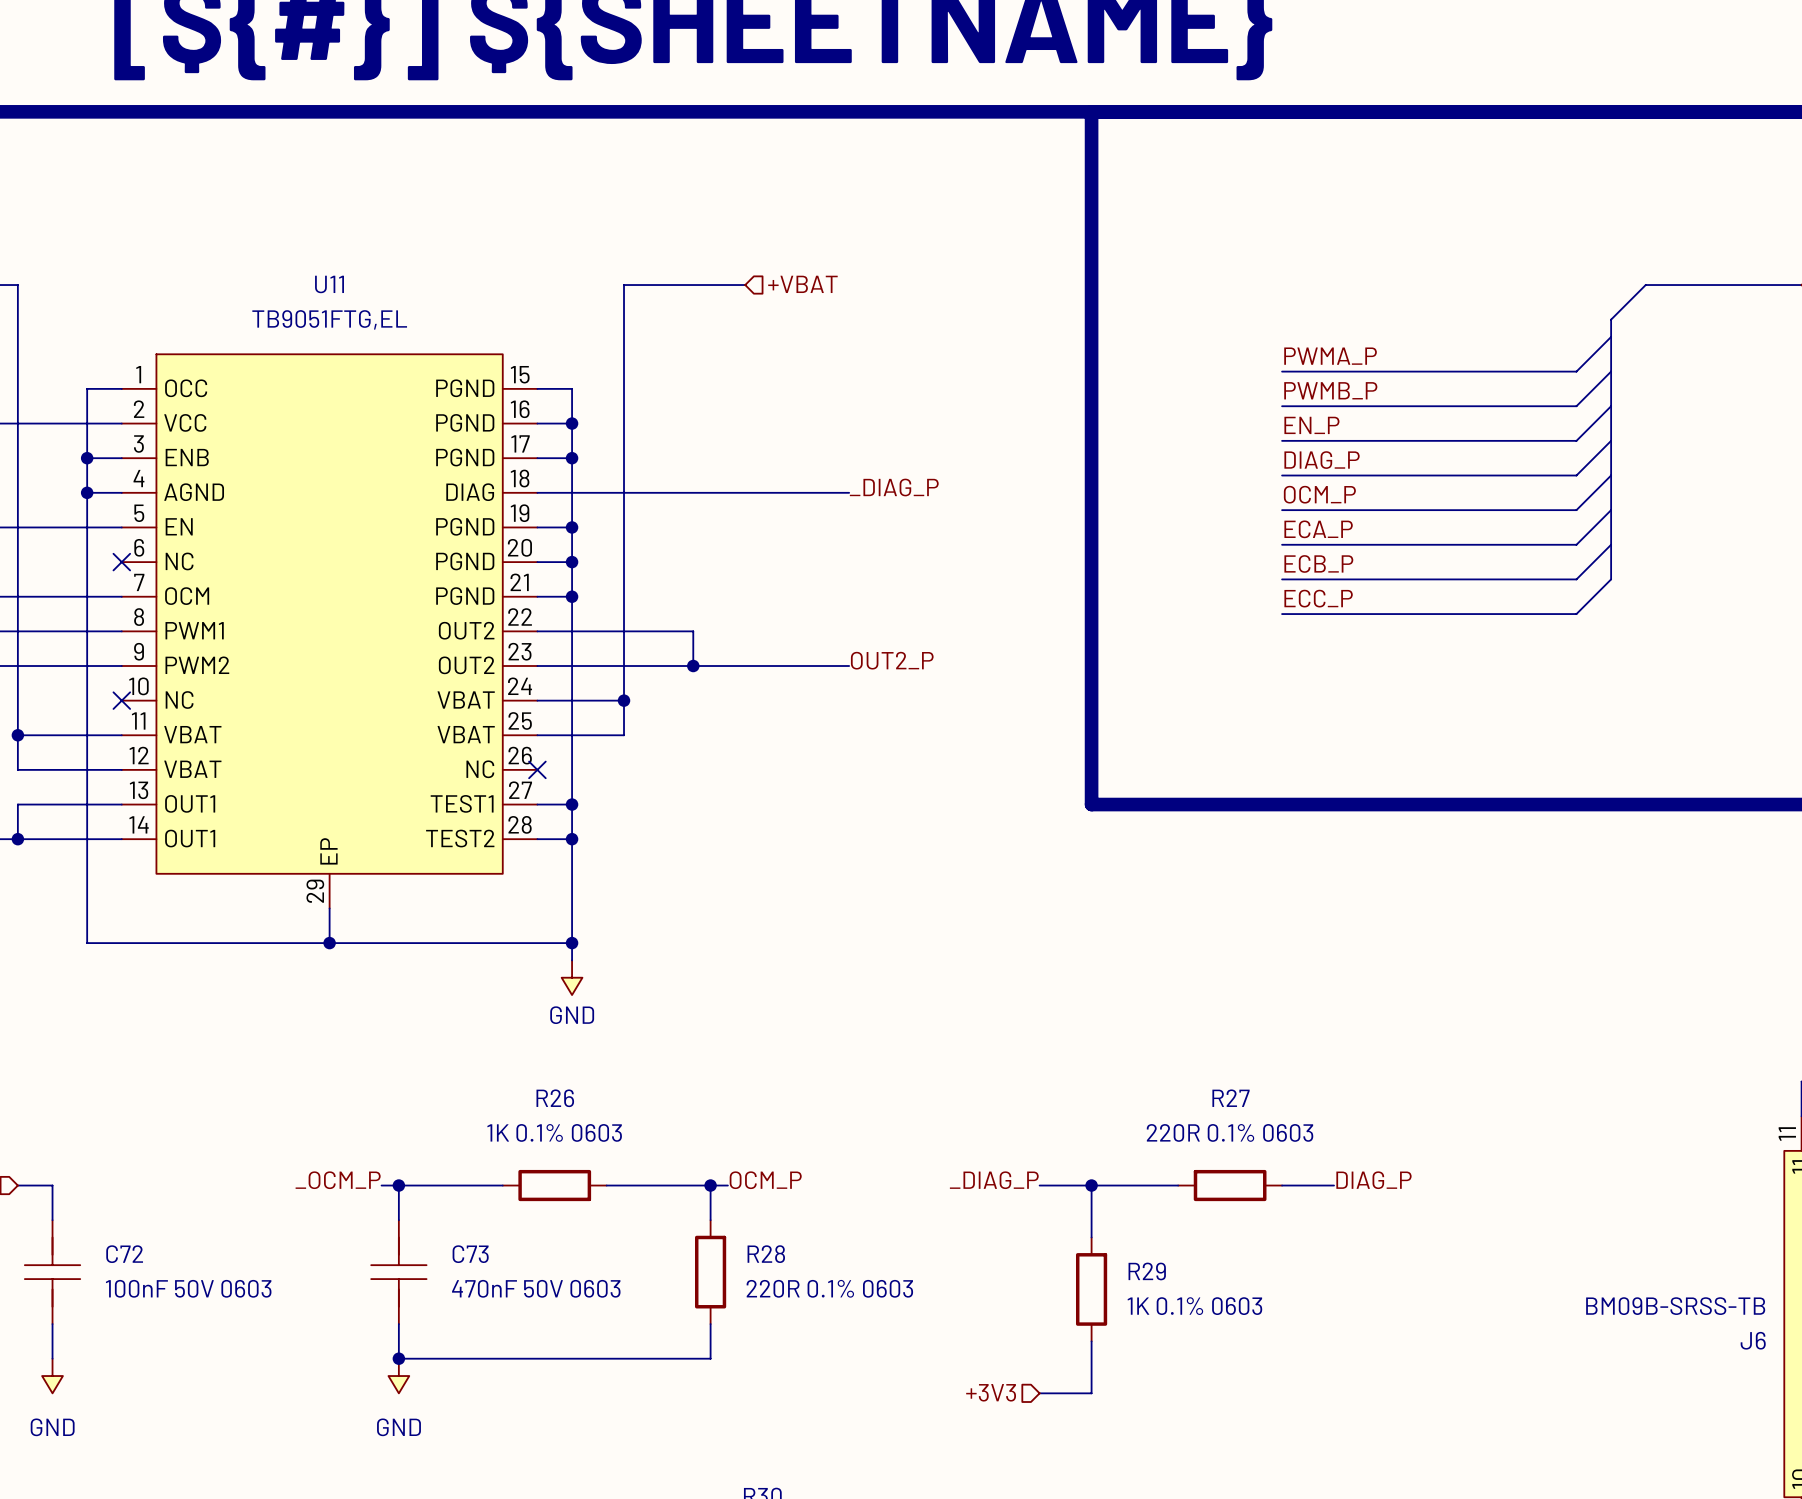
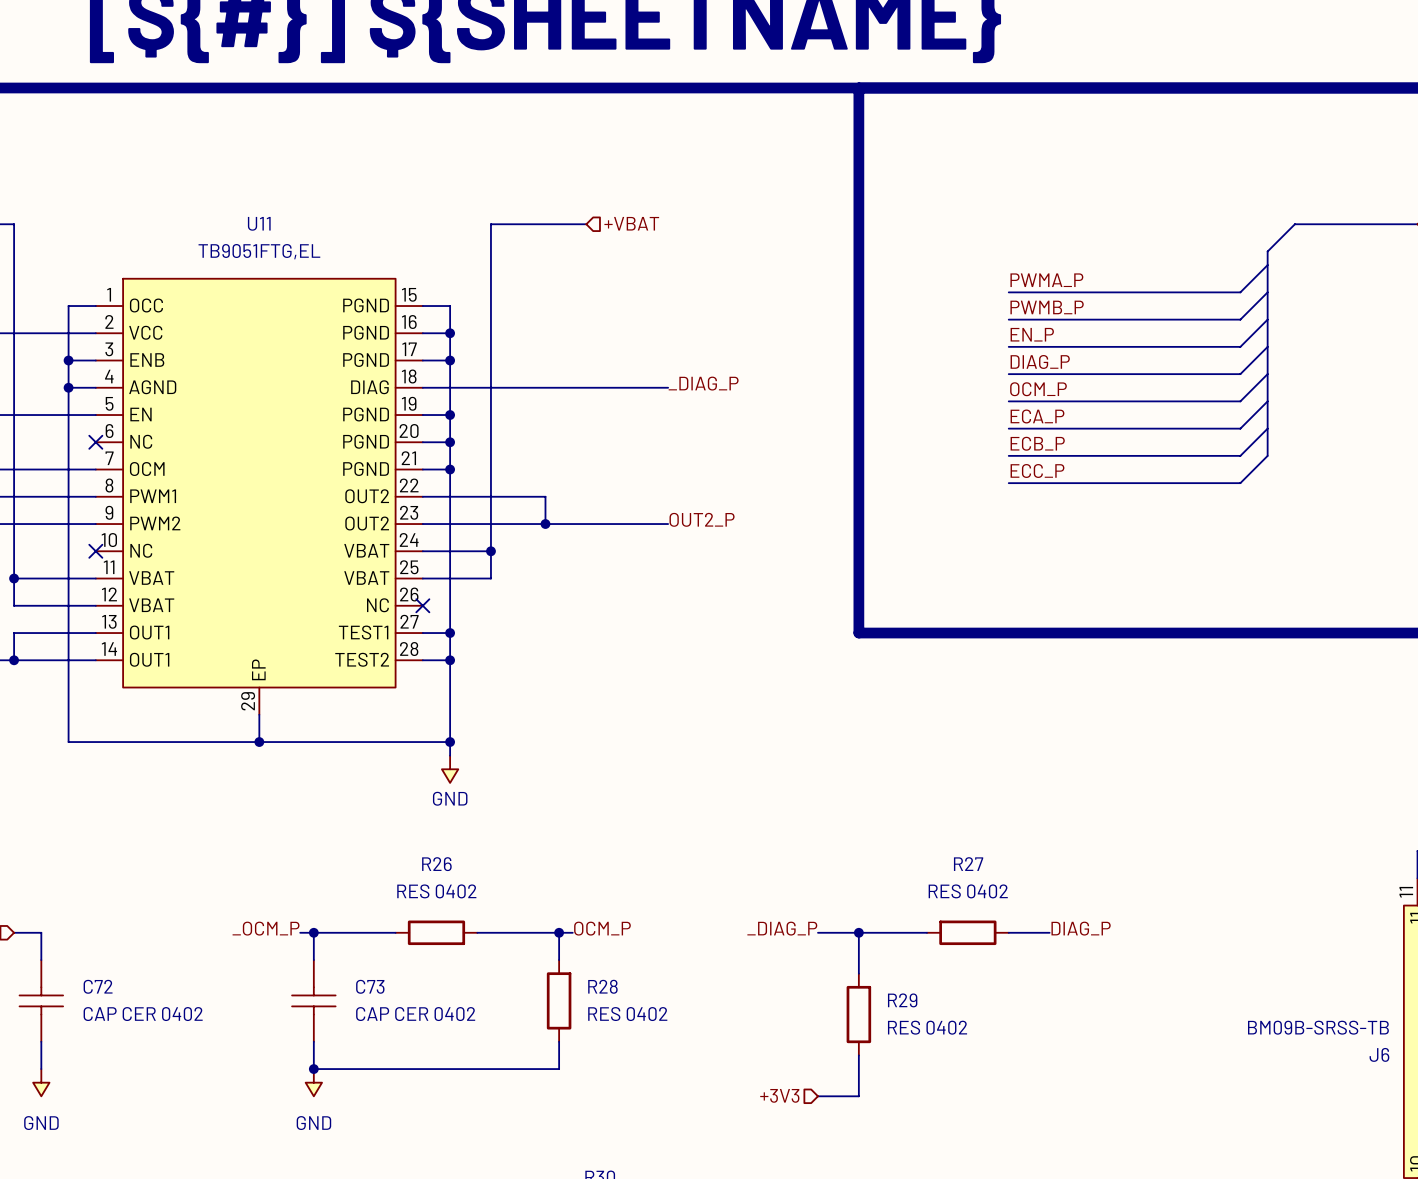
R26 value: 1K 0.1% 0603 (554, 1132) -> RES 0402 (436, 891)
R27 value: 220R 0.1% 0603 (1230, 1132) -> RES 0402 (968, 891)
C72 symbol: [24, 1220, 81, 1325] -> [19, 960, 64, 1042]
C73 symbol: [371, 1220, 427, 1325] -> [292, 960, 336, 1042]
C72 value: 100nF 50V 0603 (188, 1288) -> CAP CER 0402 (143, 1014)
C73 value: 470nF 50V 0603 (536, 1288) -> CAP CER 0402 (415, 1014)
R28 value: 220R 0.1% 0603 (829, 1288) -> RES 0402 (627, 1014)
R29 value: 1K 0.1% 0603 (1194, 1306) -> RES 0402 (927, 1027)

